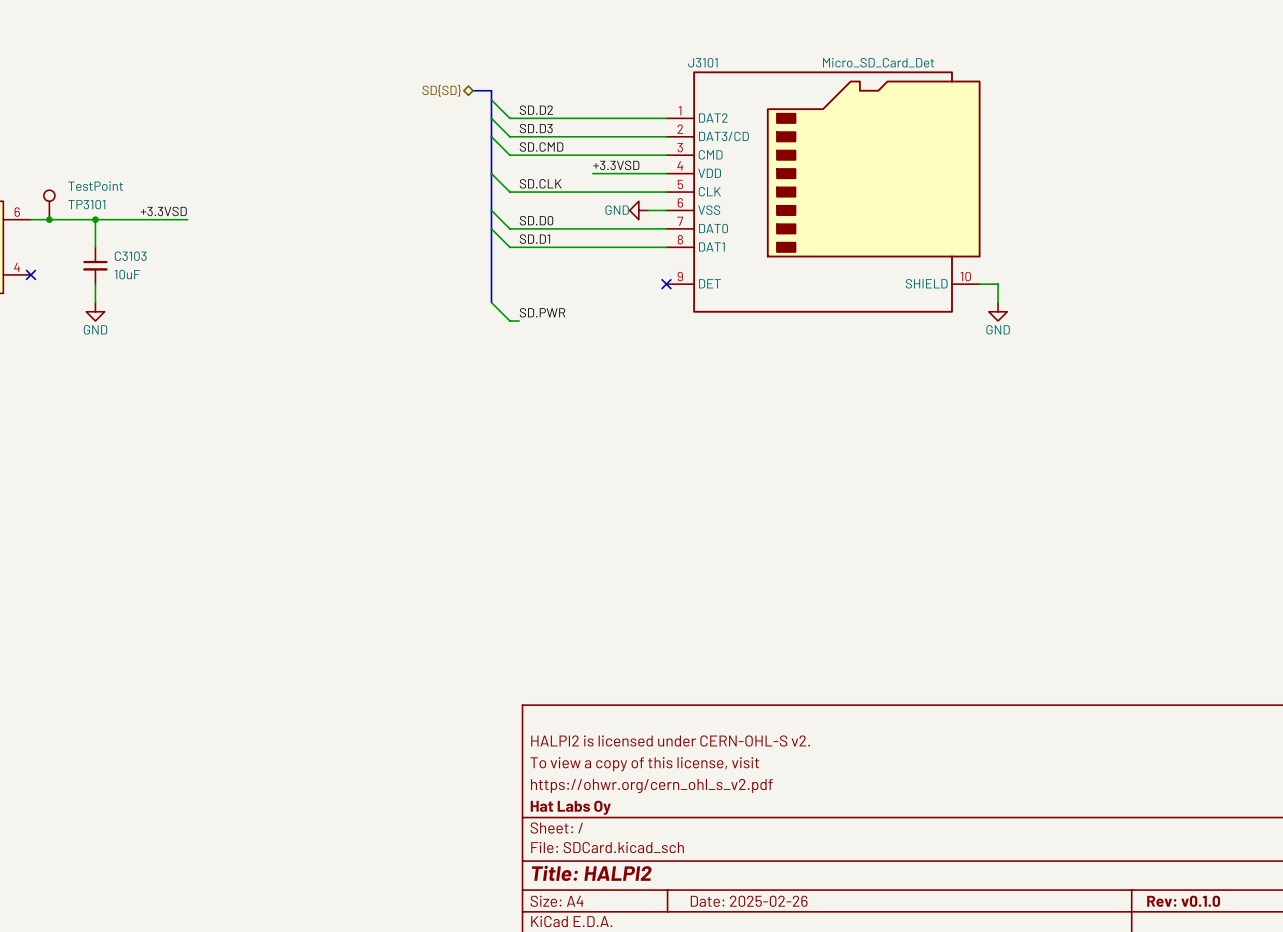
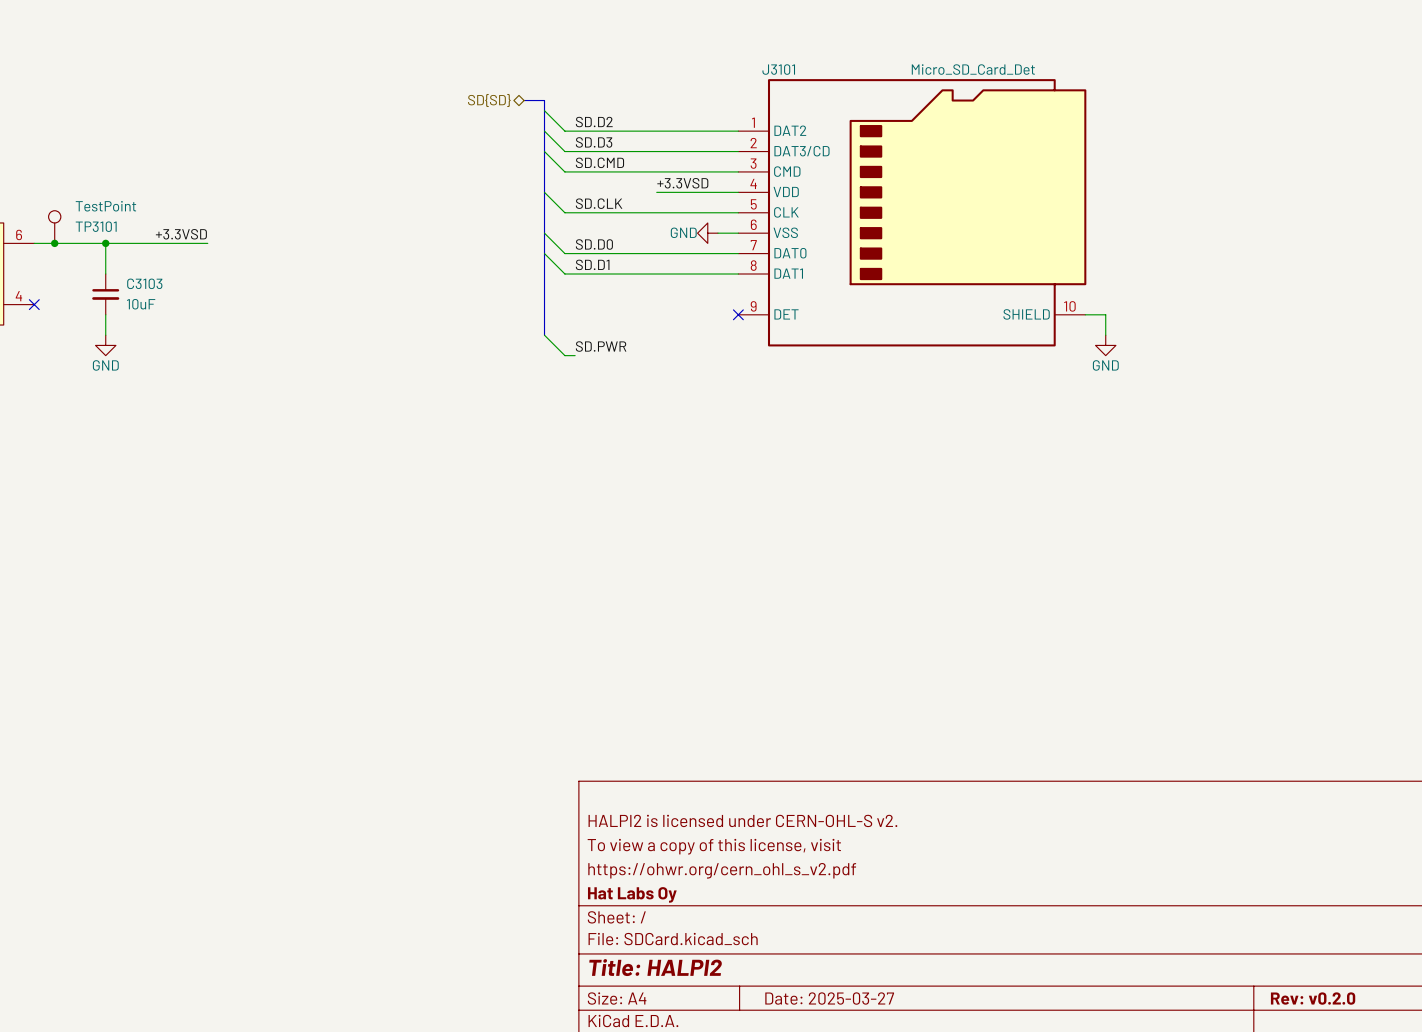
title block: Date: 2025-02-26 (749, 901) -> Date: 2025-03-27 (829, 998)
title block: Rev: v0.1.0 (1183, 901) -> Rev: v0.2.0 (1313, 998)

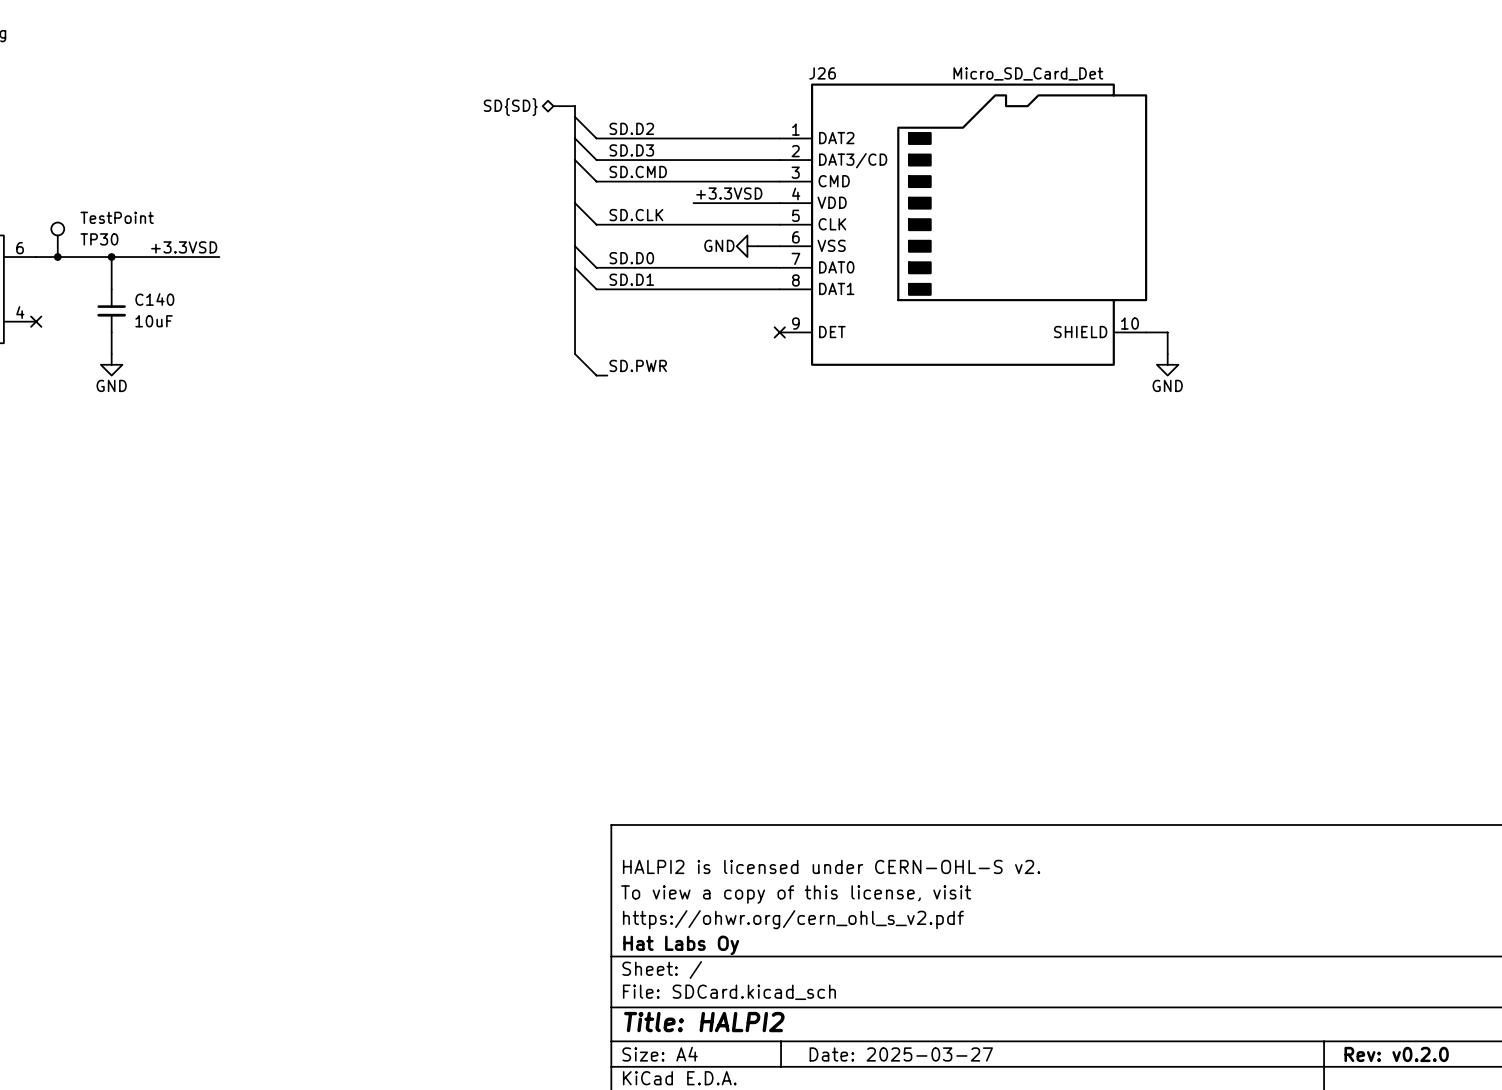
J3101 name: J3101 (778, 69) -> J26 (822, 73)
TP3101 name: TP3101 (96, 226) -> TP30 (99, 239)
C3103 name: C3103 (144, 283) -> C140 (154, 299)

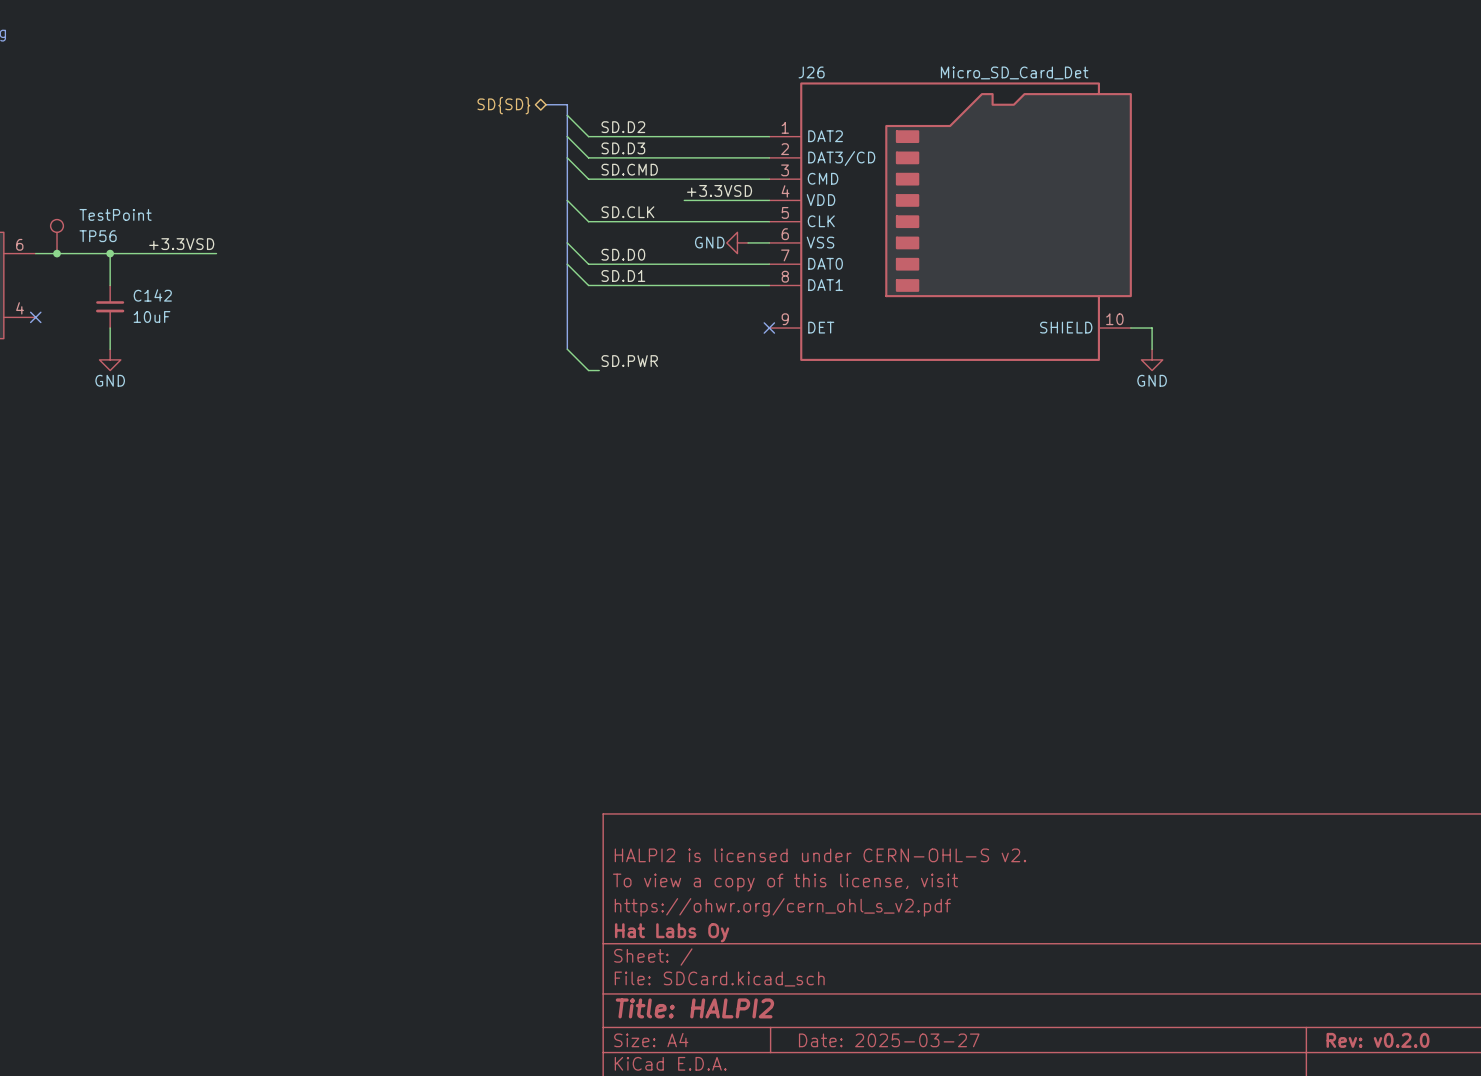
TP30 name: TP30 (99, 239) -> TP56 (98, 236)
C140 name: C140 (154, 299) -> C142 (152, 295)

